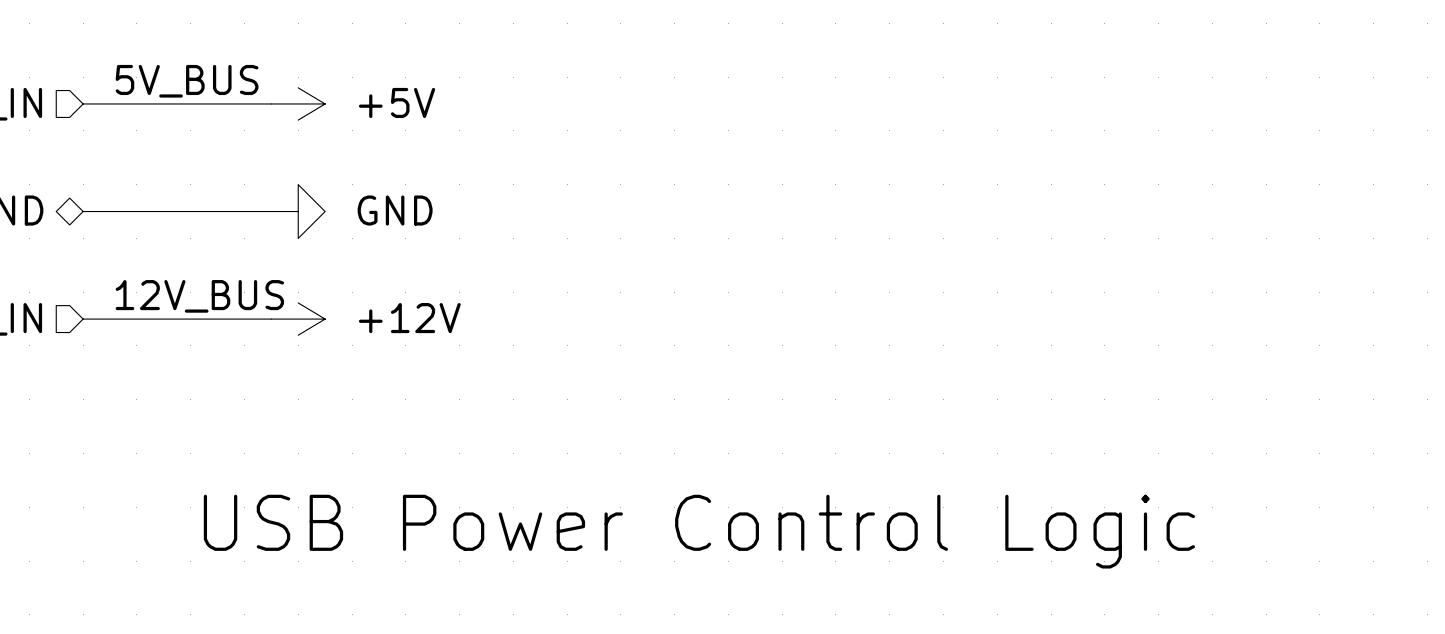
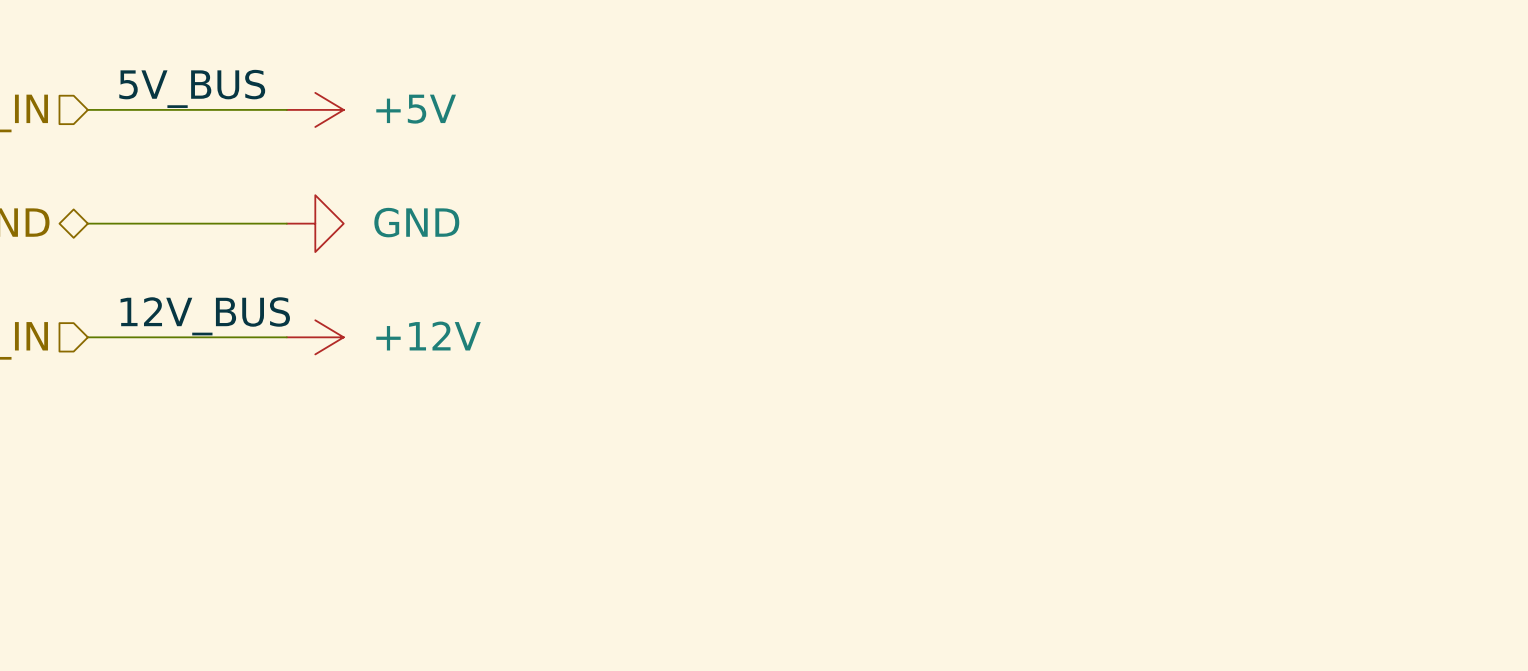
text: USB Power Control Logic (699, 531) -> none

